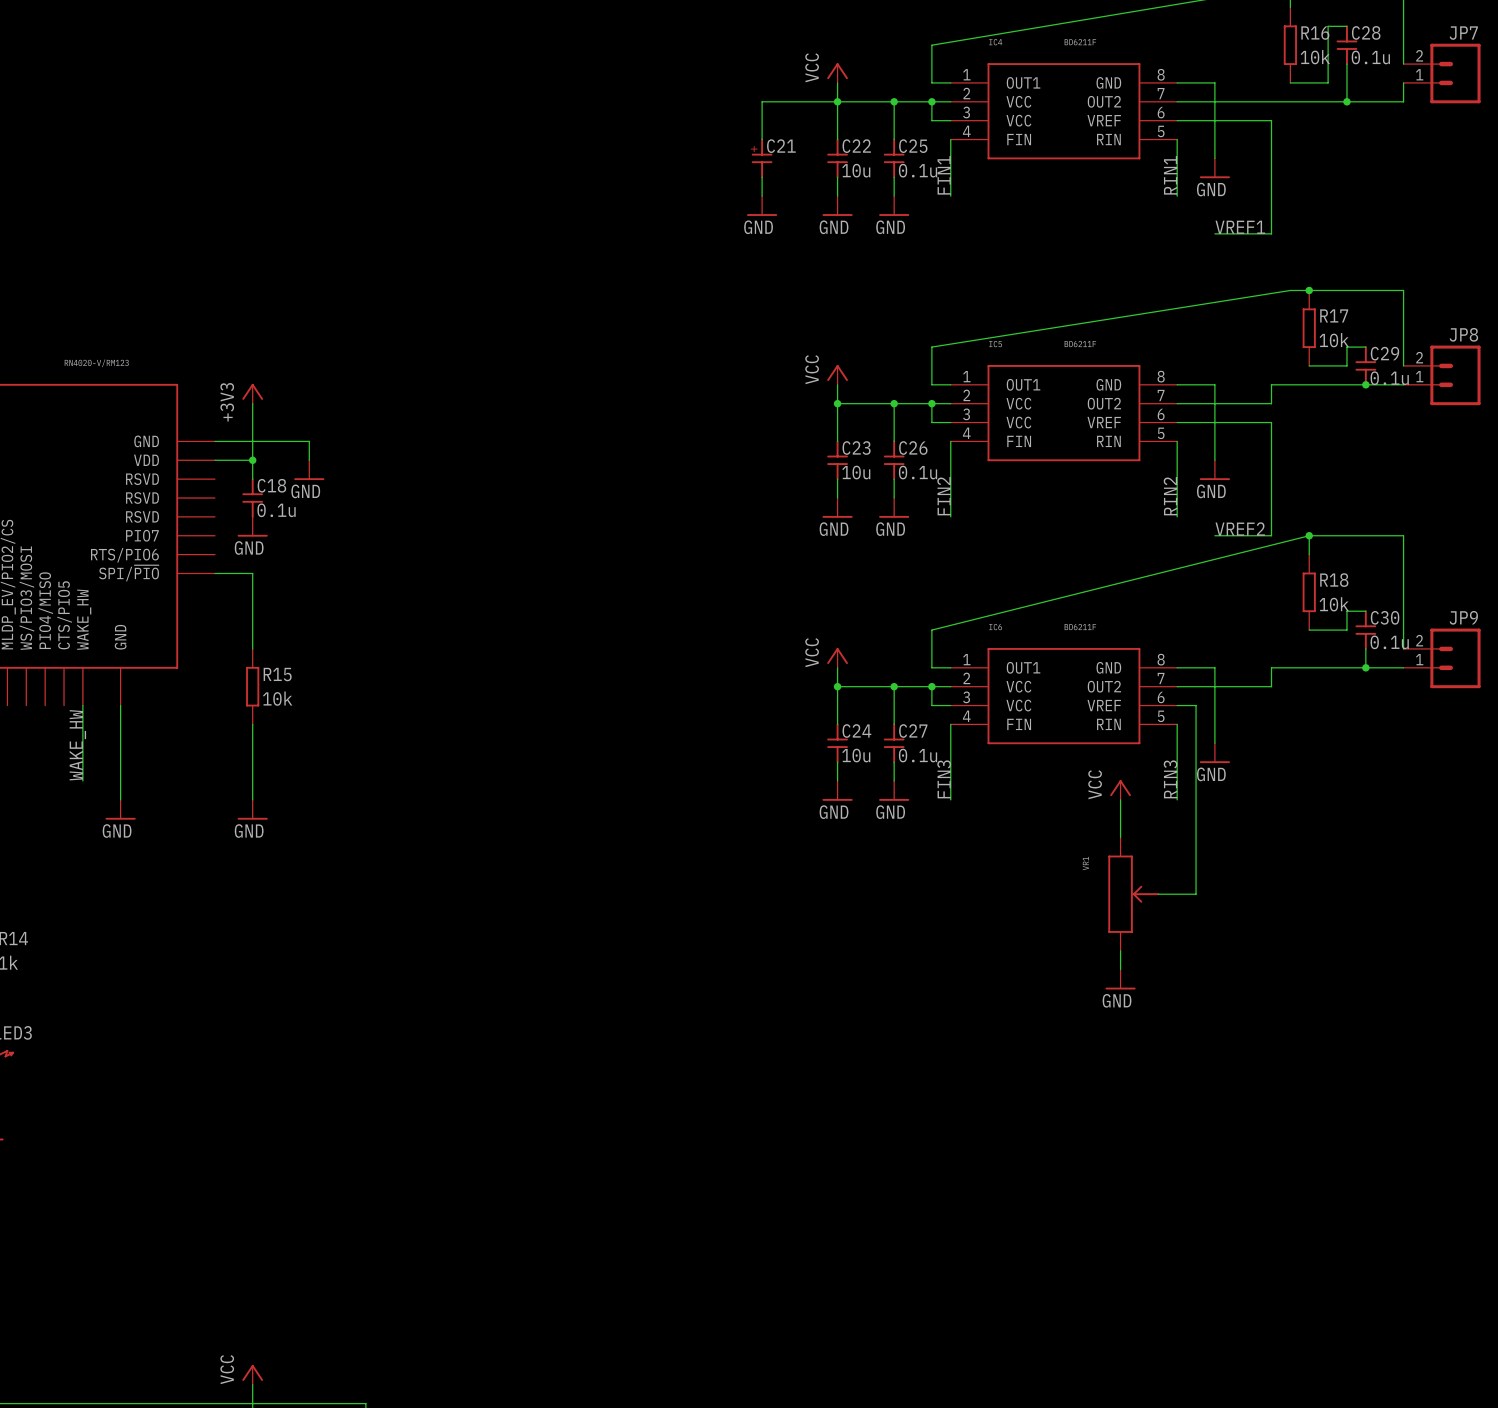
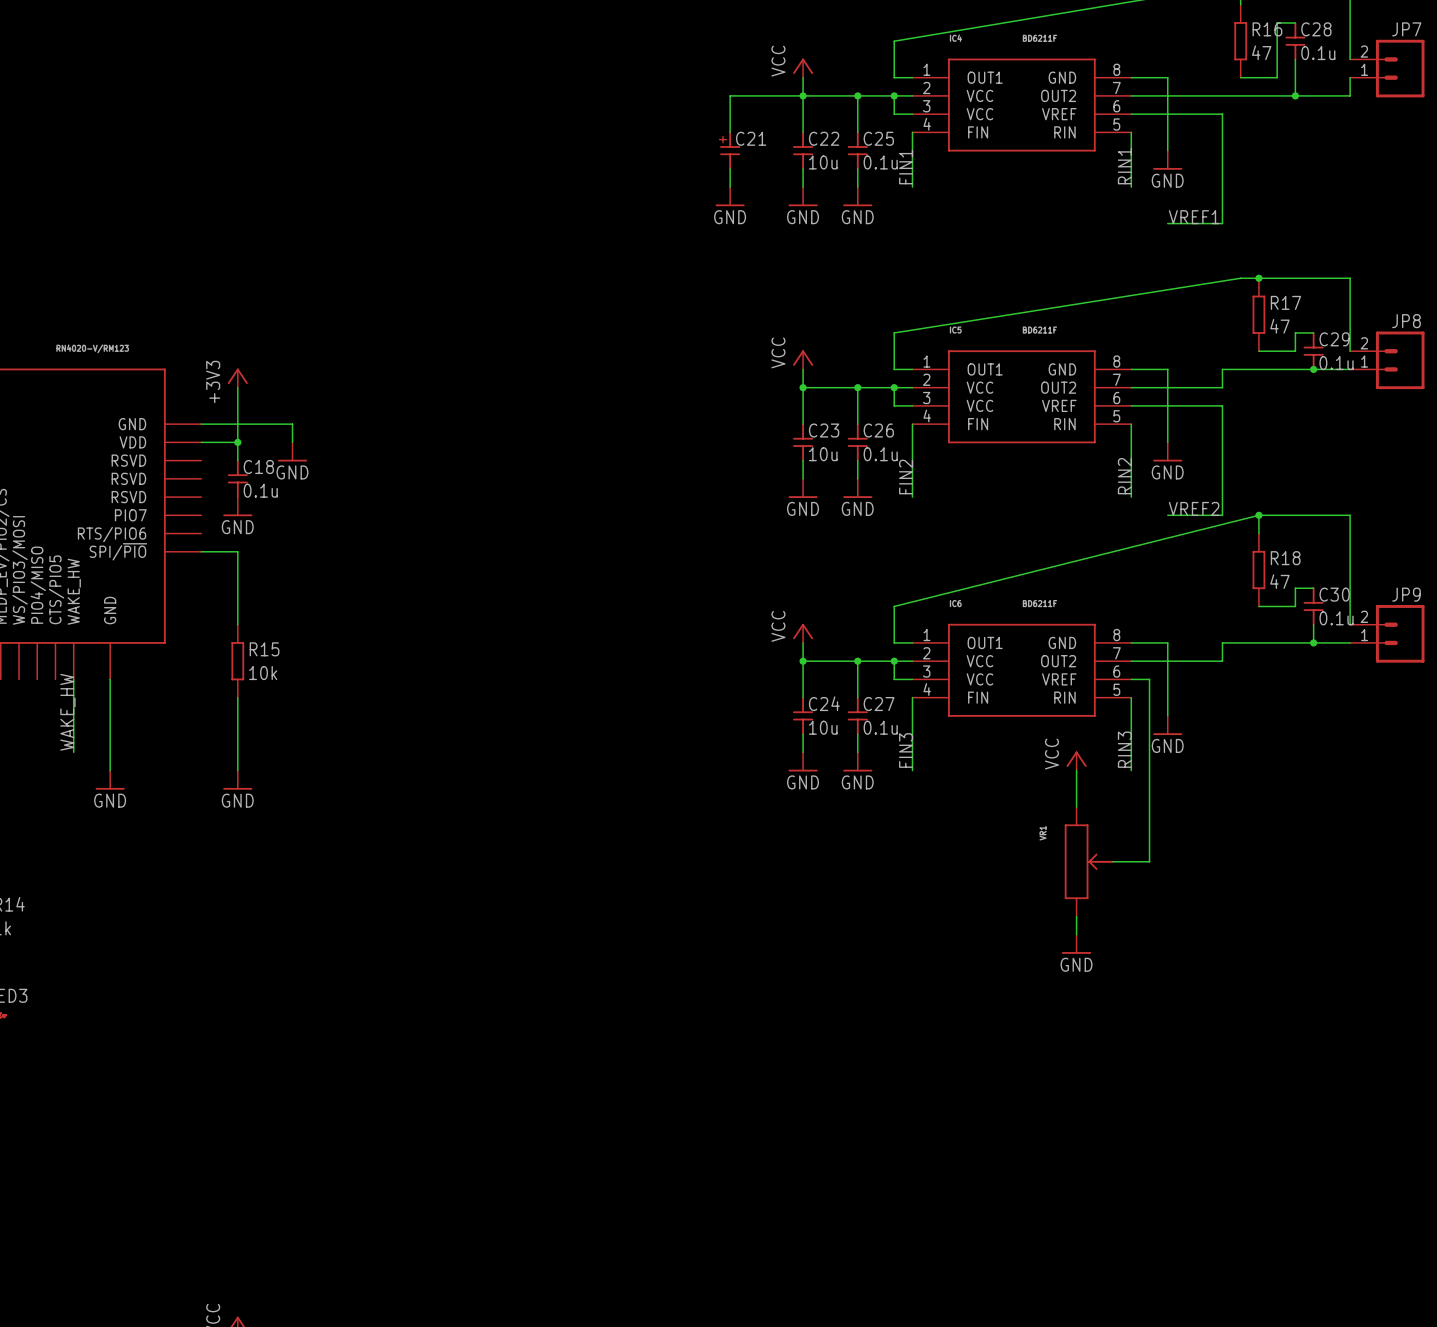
R16 value: 10k (1315, 57) -> 47 (1261, 52)
R17 value: 10k (1334, 340) -> 47 (1279, 326)
R18 value: 10k (1334, 604) -> 47 (1279, 581)

